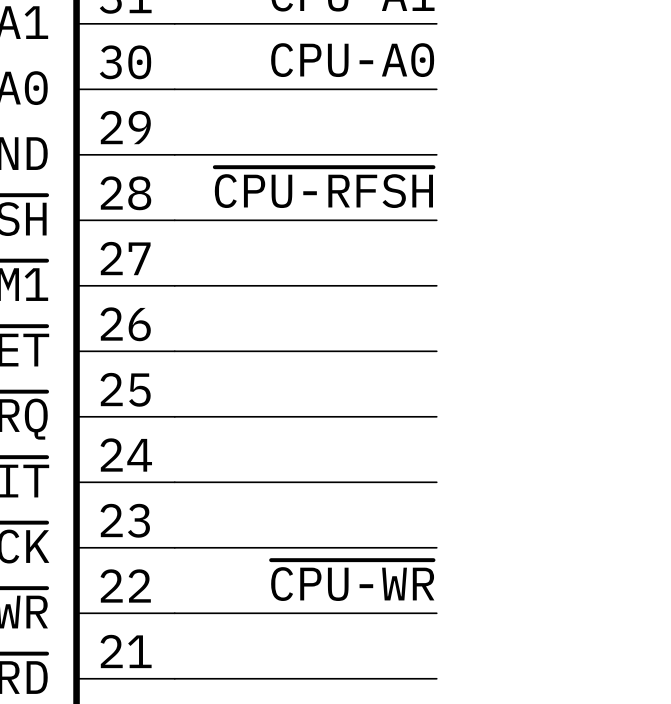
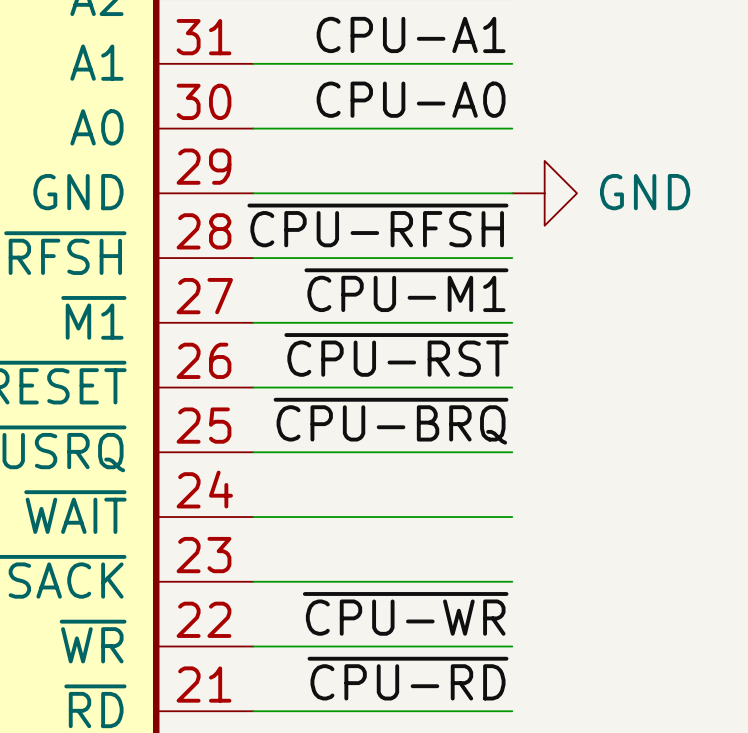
power symbol: none -> GND (544, 193)
label: none -> ~{CPU-M1} (406, 290)
label: none -> ~{CPU-RST} (396, 354)
label: none -> ~{CPU-BRQ} (391, 421)
label: none -> ~{CPU-RD} (408, 678)

